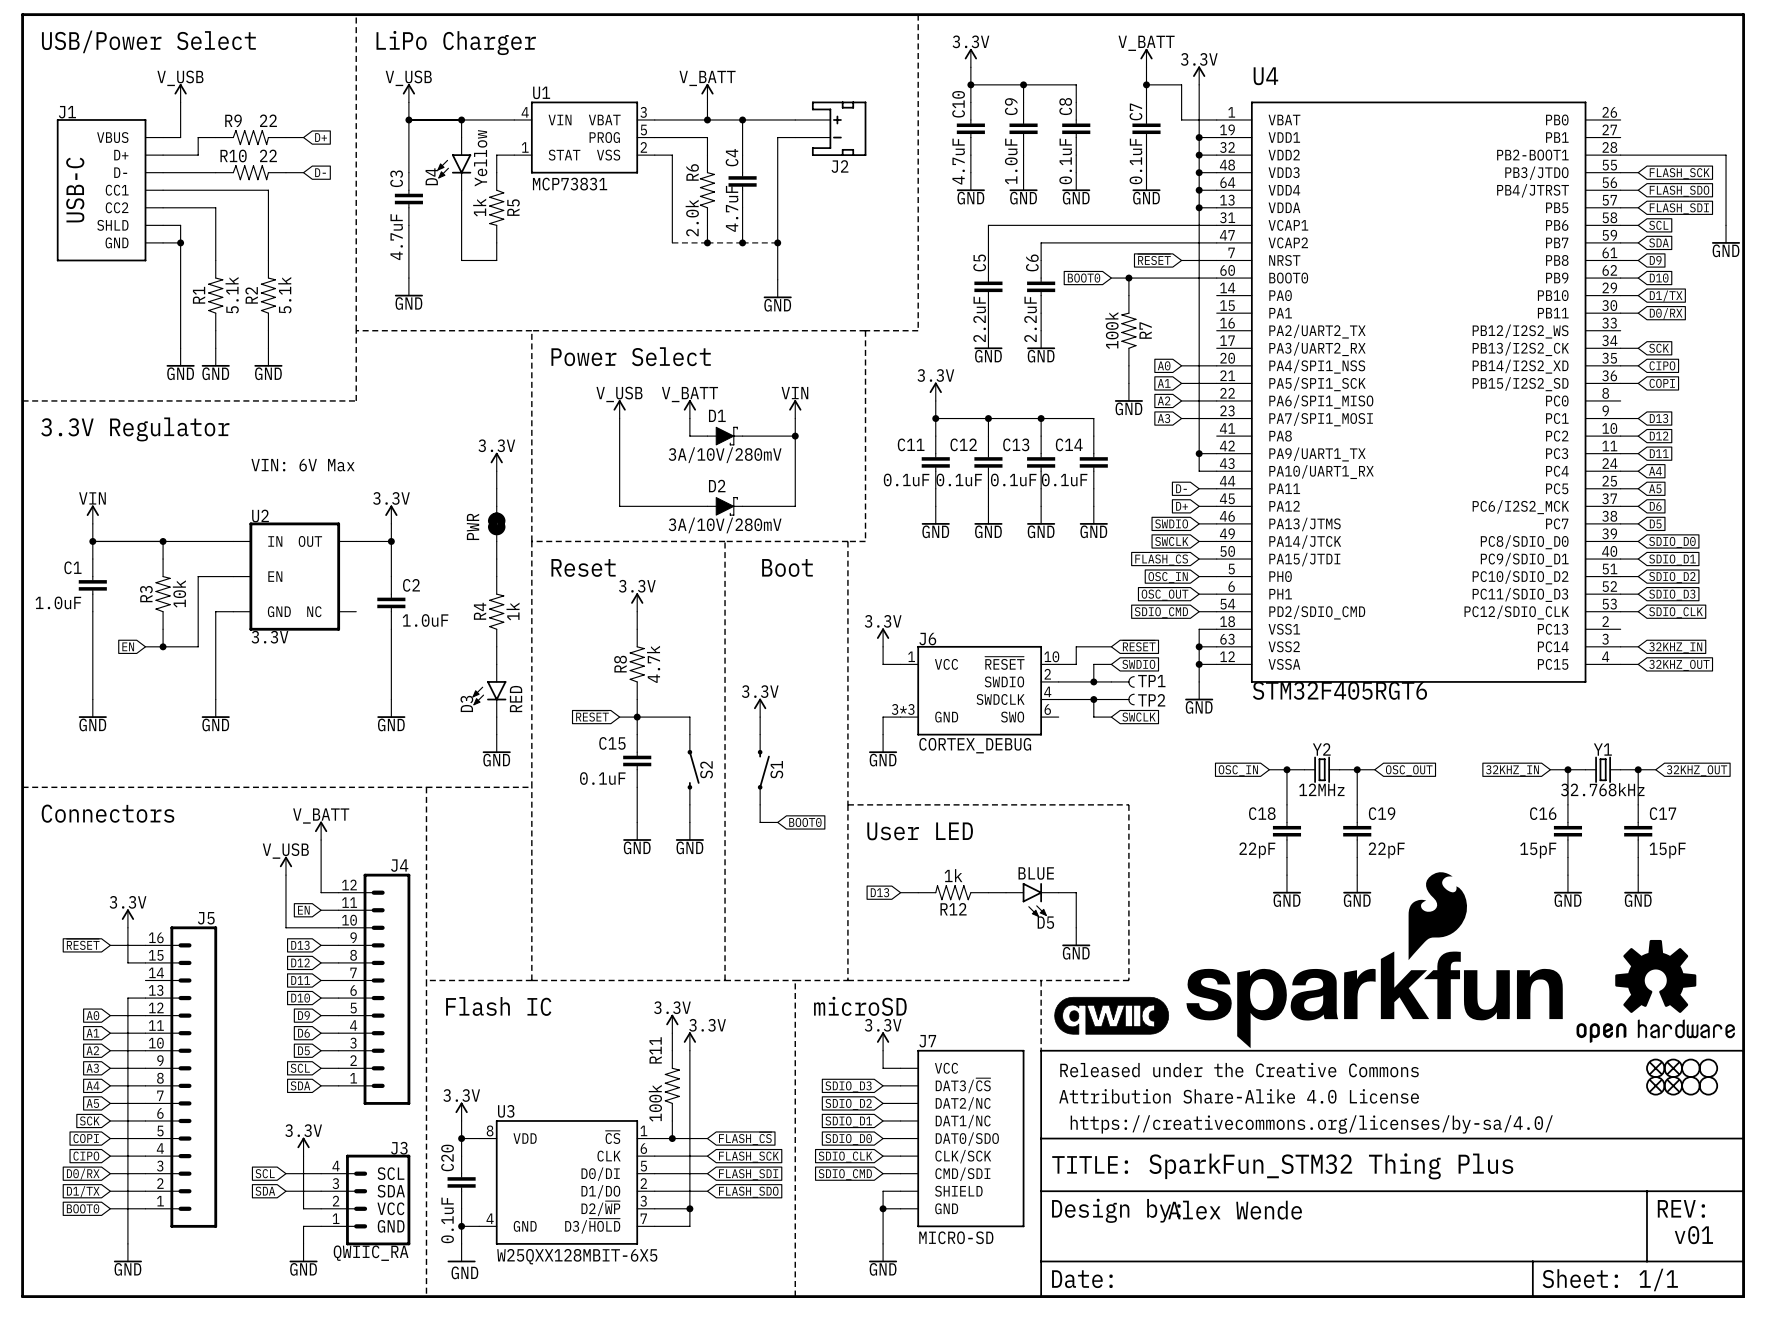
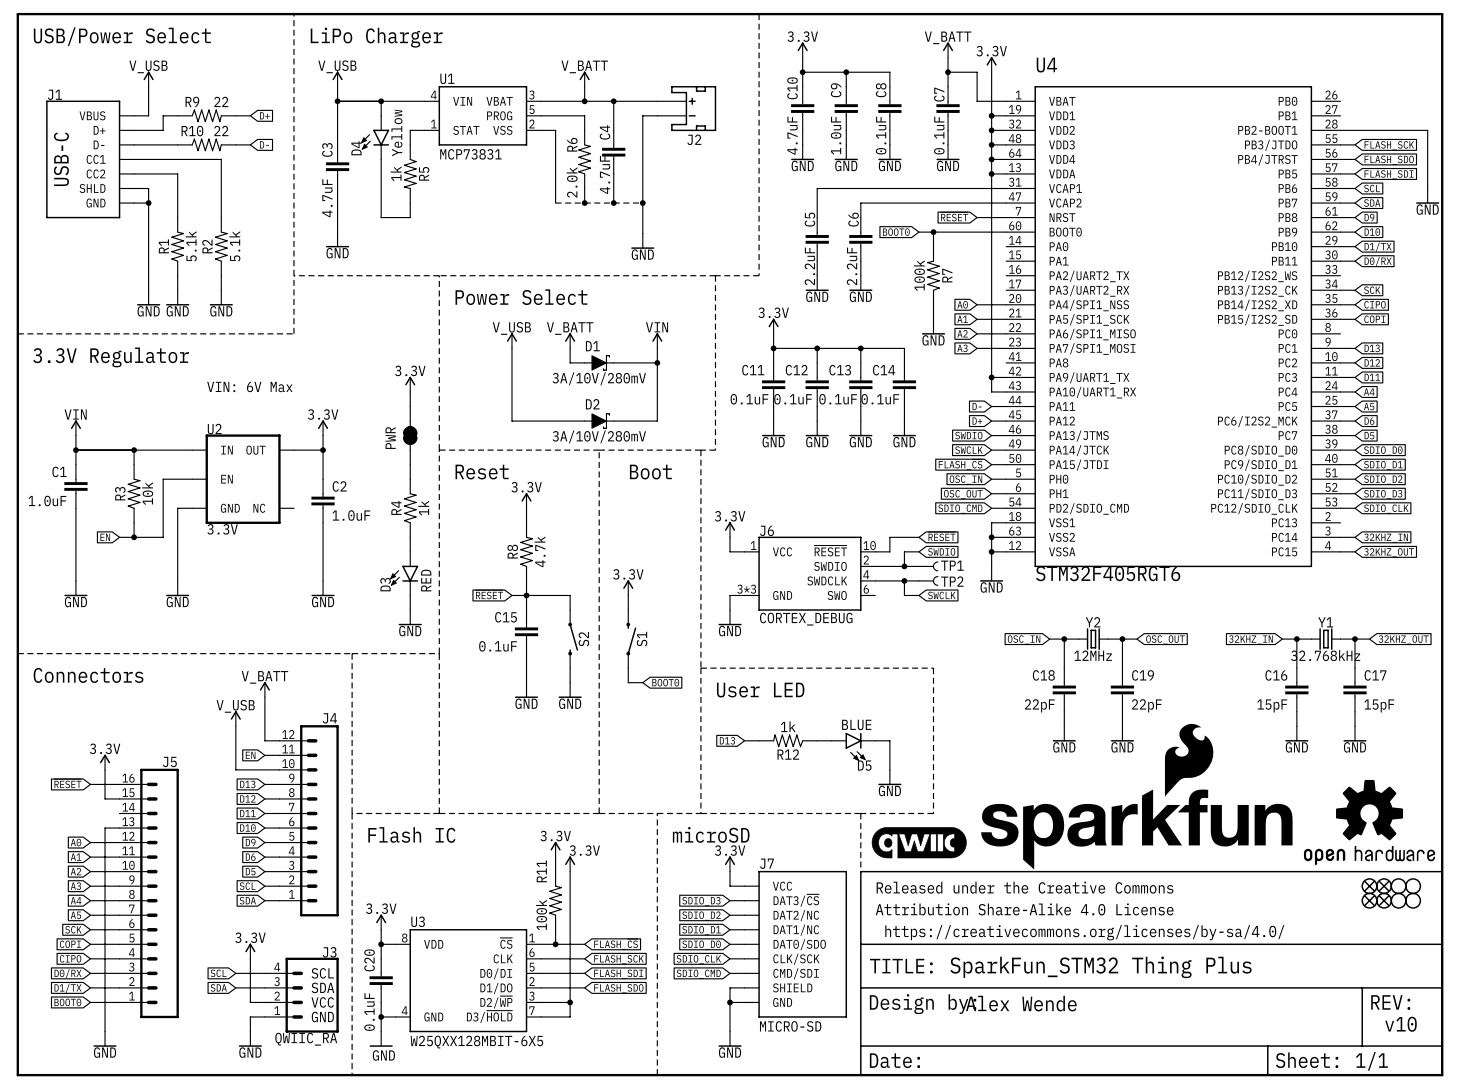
text: v01 (1693, 1235) -> v10 (1401, 1024)

